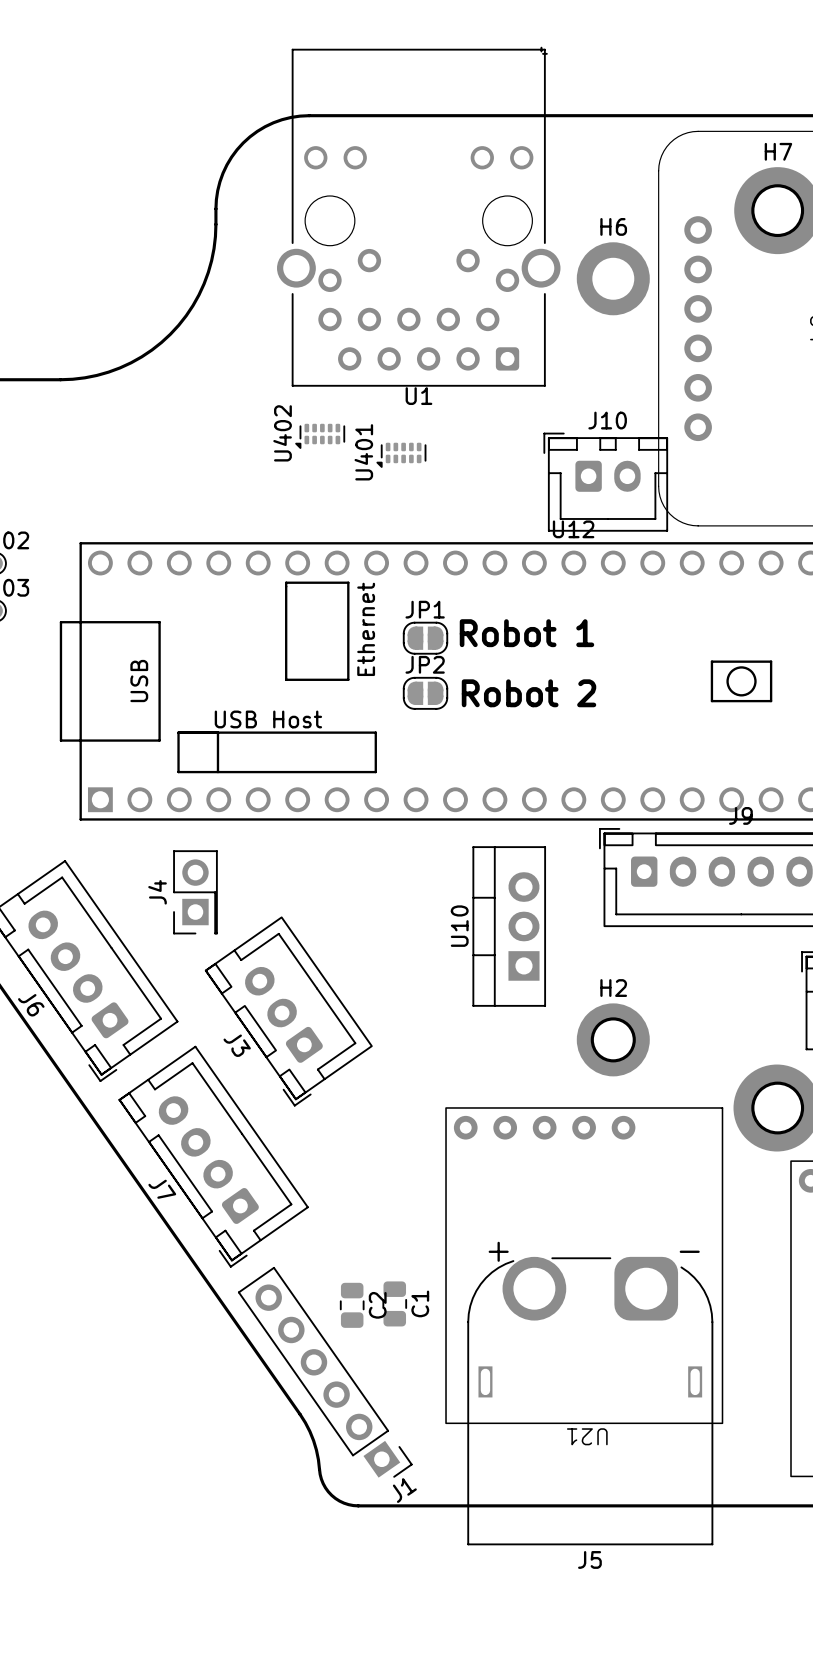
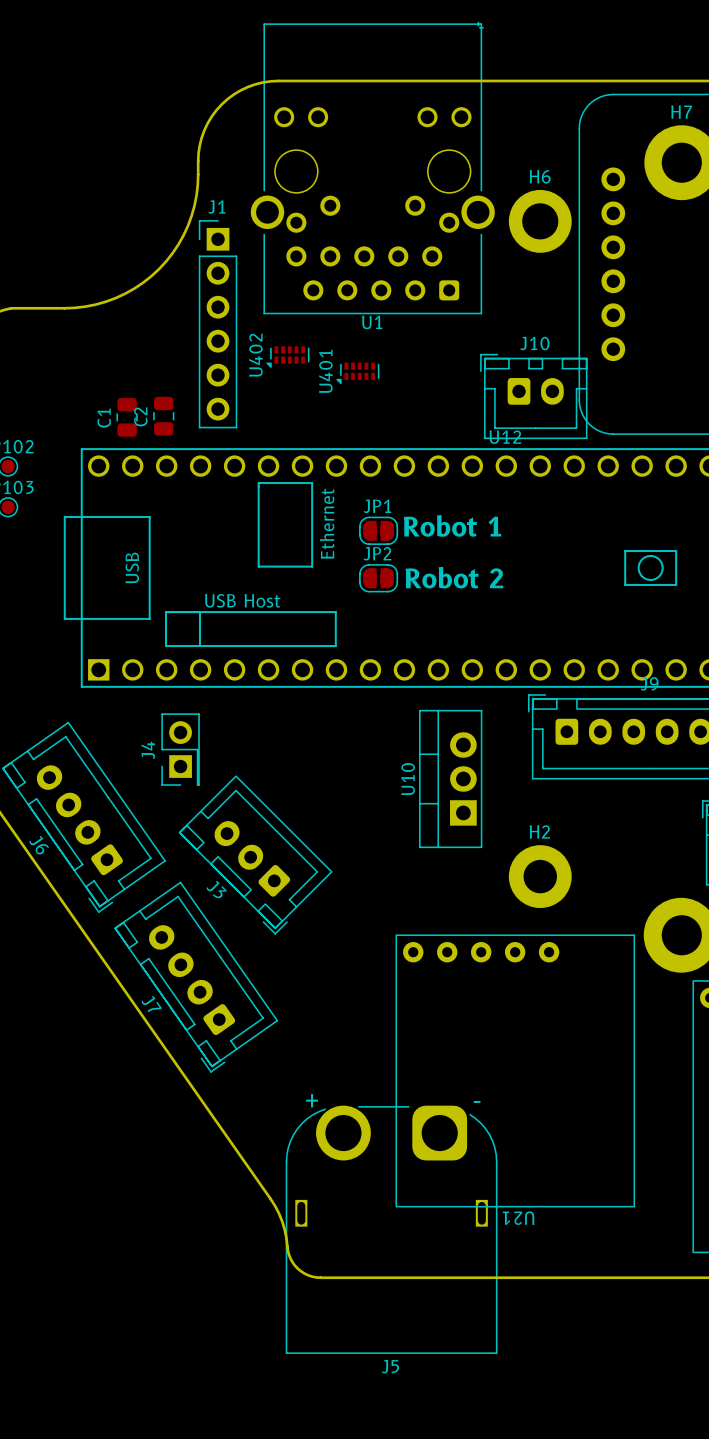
J3 footprint: [204, 916, 373, 1107] -> [178, 775, 333, 935]
C1 position: (394, 1303) -> (127, 417)
C1 name position: C1 (420, 1303) -> C1 (104, 418)
C2 position: (352, 1305) -> (163, 416)
C2 name position: C2 (377, 1305) -> C2 (140, 416)
J1 rotation: 0° (325, 1372) -> 145° counterclockwise (218, 324)
J1 position: (325, 1372) -> (218, 324)
J5 position: (590, 1401) -> (391, 1229)

